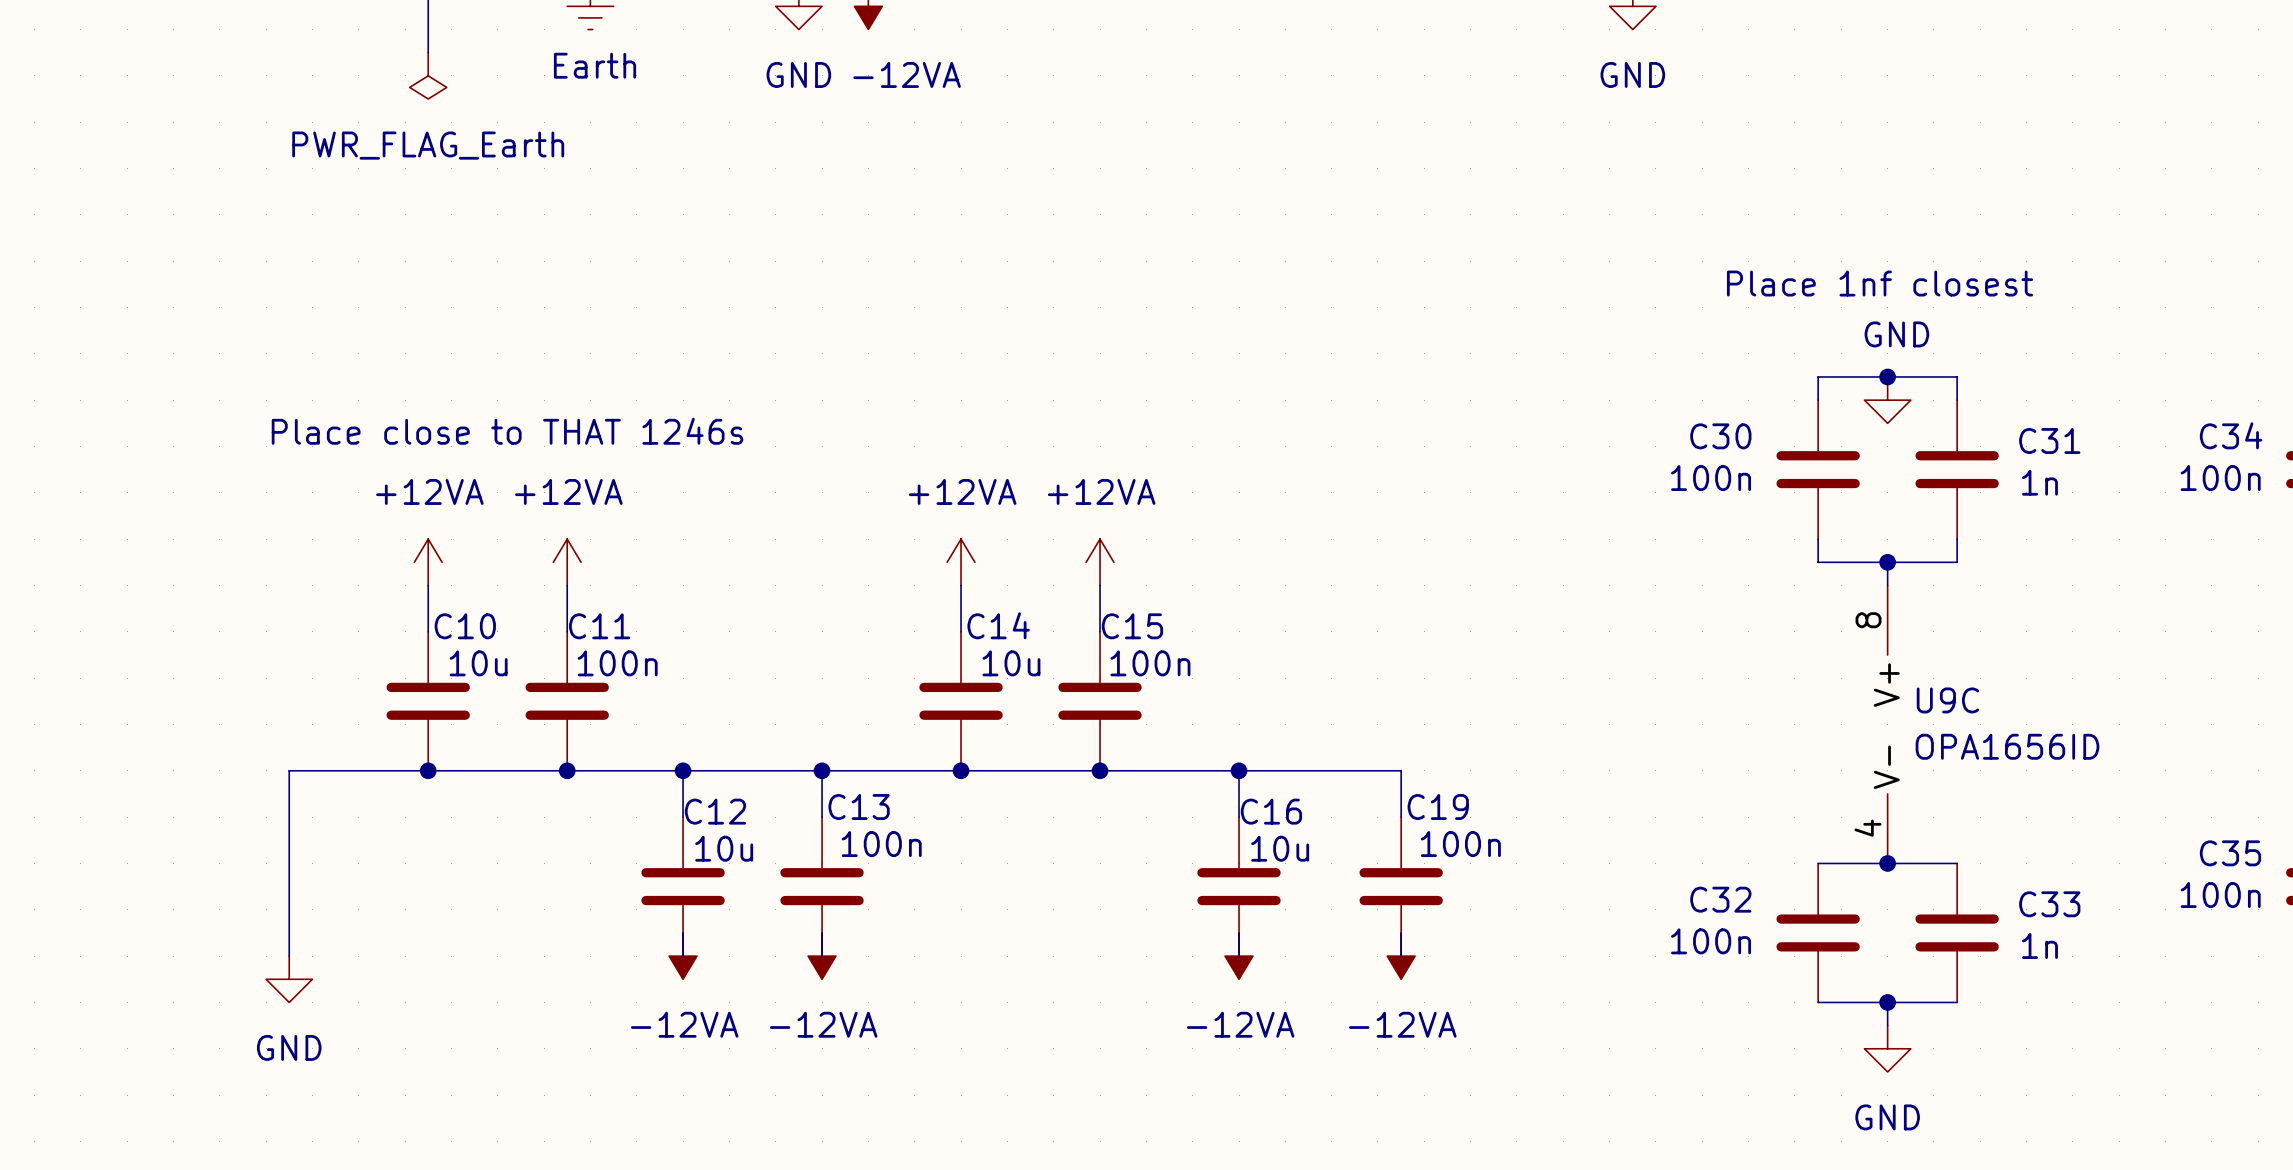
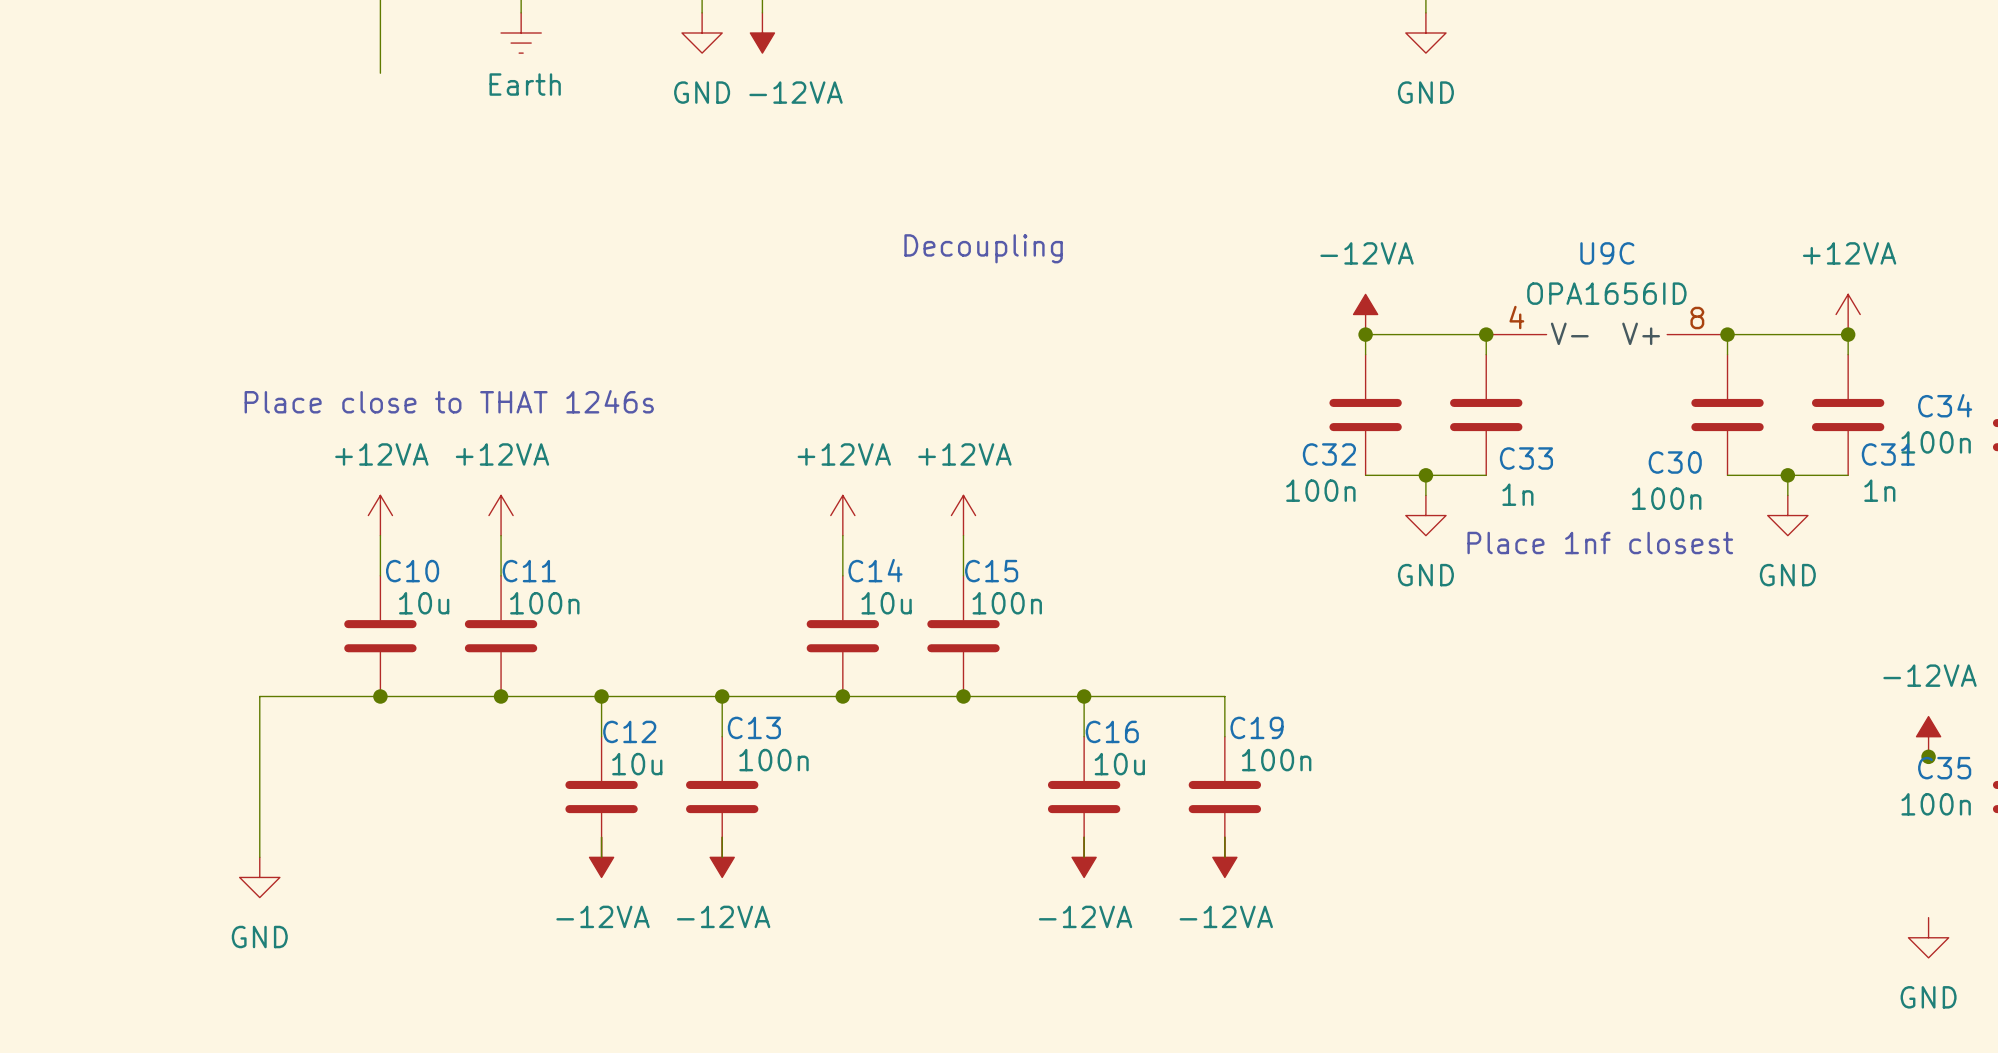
power symbol: PWR_FLAG_Earth (428, 75) -> none
text: none -> Decoupling (983, 248)
text position: Place 1nf closest (1880, 283) -> Place 1nf closest (1600, 543)
power symbol: none -> -12VA (1365, 314)
power symbol: none -> +12VA (1848, 314)
junction: none -> (1365, 334)
junction: none -> (1486, 334)
junction: none -> (1727, 334)
junction: none -> (1848, 334)
wire: none -> (1365, 354) (1365, 334) (1486, 334) (1486, 354)
junction: (1887, 376) -> none
wire: (1818, 400) (1818, 376) (1957, 376) (1957, 400) -> (1727, 354) (1727, 334) (1848, 334) (1848, 354)
power symbol: GND (1887, 400) -> none
C30 name position: C30 (1720, 436) -> C30 (1675, 462)
C31 name position: C31 (2049, 440) -> C31 (1888, 454)
C30 position: (1818, 469) -> (1727, 415)
C31 position: (1957, 469) -> (1848, 415)
C30 value position: 100n (1711, 478) -> 100n (1666, 498)
C31 value position: 1n (2039, 482) -> 1n (1879, 490)
wire: none -> (1365, 475) (1486, 475)
wire: none -> (1425, 475) (1425, 495)
junction: none -> (1425, 475)
junction: none -> (1787, 475)
wire: (1818, 539) (1818, 562) (1957, 562) (1957, 539) -> none
power symbol: none -> GND (1425, 515)
wire: (1887, 562) (1887, 585) -> (1787, 475) (1787, 495)
junction: (1887, 562) -> none
power symbol: none -> GND (1787, 515)
U9C name position: U9C (1947, 700) -> U9C (1607, 253)
U9C rotation: 0° (1887, 724) -> 90° clockwise (1606, 334)
U9C position: (1887, 724) -> (1606, 334)
U9C value position: OPA1656ID (2007, 746) -> OPA1656ID (1606, 293)
power symbol: none -> -12VA (1928, 736)
junction: none -> (1928, 756)
wire: (1818, 863) (1957, 863) -> (1727, 475) (1848, 475)
junction: (1887, 863) -> none
C32 name position: C32 (1720, 899) -> C32 (1329, 454)
C33 name position: C33 (2049, 904) -> C33 (1526, 458)
C32 position: (1818, 932) -> (1365, 415)
C33 position: (1957, 932) -> (1486, 415)
C32 value position: 100n (1711, 941) -> 100n (1320, 490)
C33 value position: 1n (2039, 945) -> 1n (1517, 494)
wire: (1818, 1002) (1957, 1002) -> none
wire: (1887, 1002) (1887, 1025) -> none
junction: (1887, 1002) -> none
power symbol: GND (1887, 1048) -> none
power symbol: none -> GND (1928, 937)

